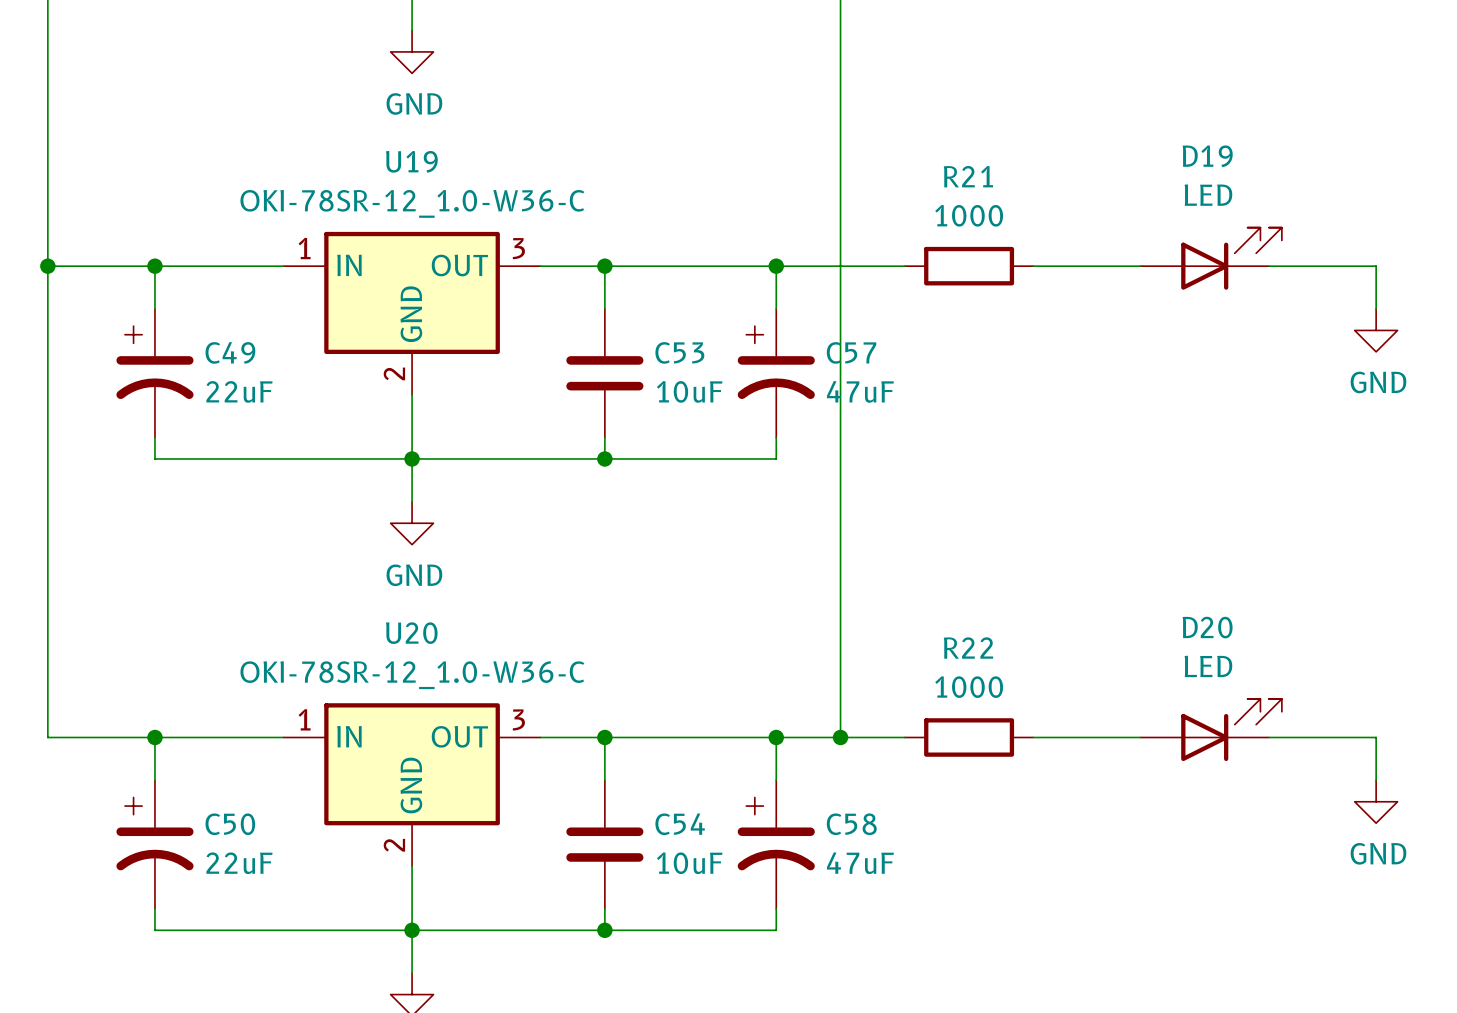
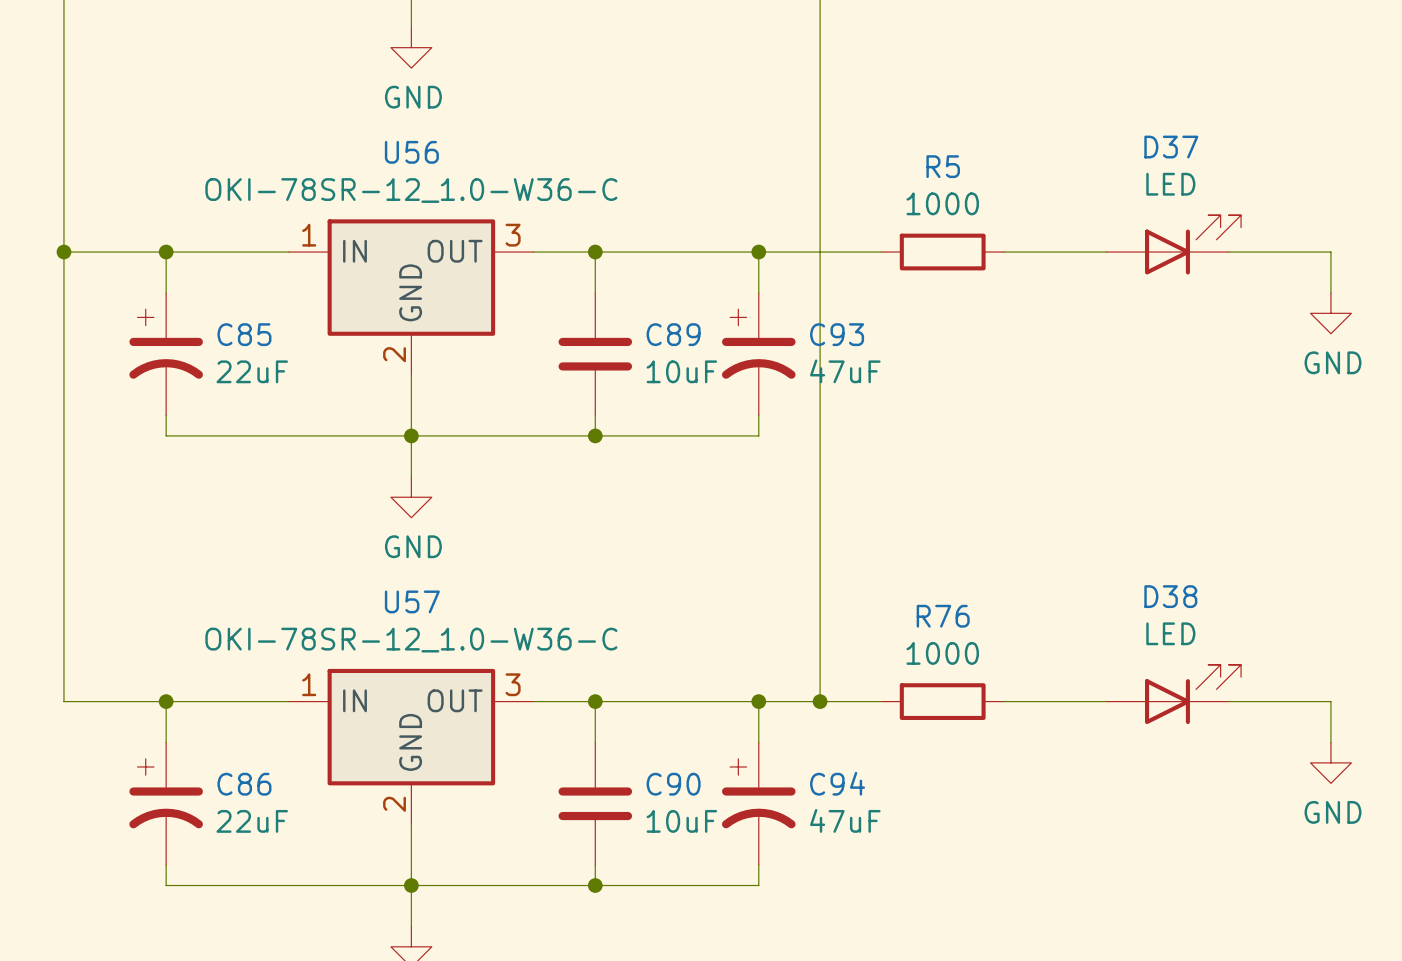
D19 name: D19 (1207, 156) -> D37 (1171, 147)
U19 name: U19 (411, 161) -> U56 (411, 152)
R21 name: R21 (968, 176) -> R5 (943, 166)
C49 name: C49 (230, 352) -> C85 (244, 334)
C53 name: C53 (679, 352) -> C89 (673, 334)
C57 name: C57 (851, 352) -> C93 (837, 334)
D20 name: D20 (1207, 627) -> D38 (1170, 596)
U20 name: U20 (411, 633) -> U57 (412, 601)
R22 name: R22 (968, 648) -> R76 (943, 616)
C50 name: C50 (230, 824) -> C86 (244, 784)
C54 name: C54 (680, 824) -> C90 (673, 784)
C58 name: C58 (851, 824) -> C94 (837, 783)

